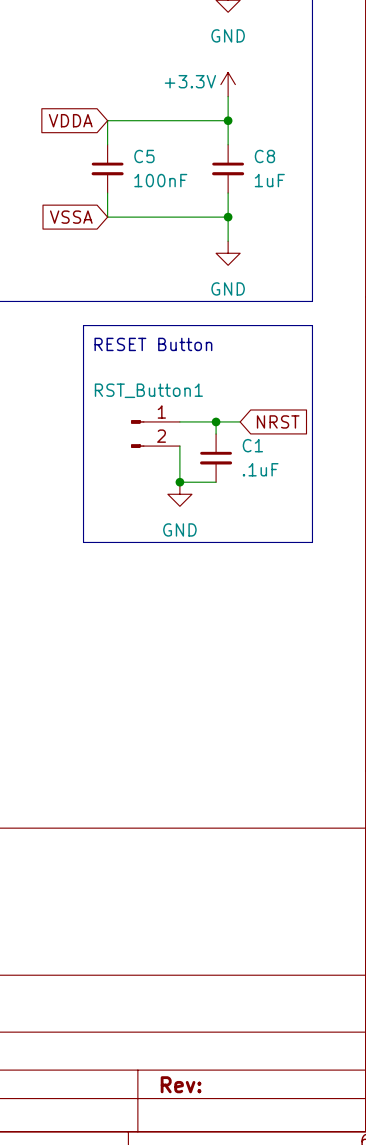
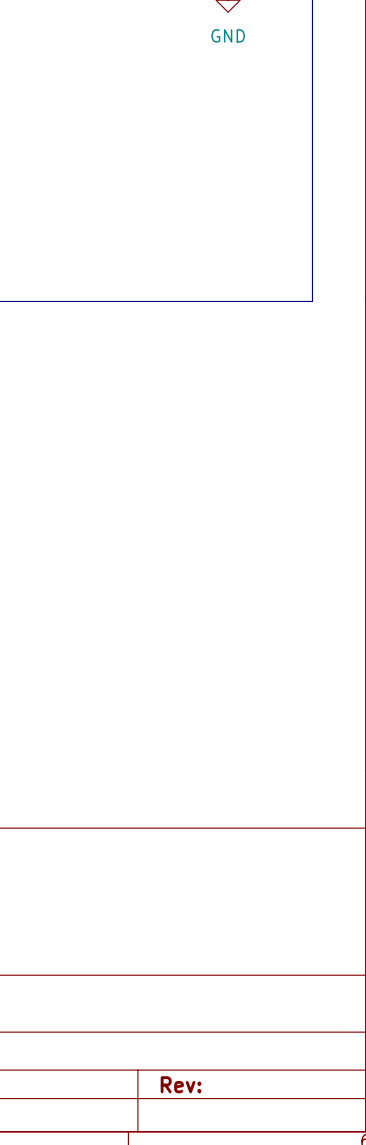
power symbol: +3.3V (228, 84) -> none
wire: (228, 96) (228, 144) -> none
global label: VDDA (70, 120) -> none
wire: (228, 120) (107, 120) (107, 144) -> none
junction: (228, 120) -> none
C5: 100nF (107, 168) -> none
C8: 1uF (228, 168) -> none
wire: (107, 193) (107, 217) (228, 217) -> none
wire: (228, 193) (228, 241) -> none
global label: VSSA (71, 217) -> none
junction: (228, 217) -> none
power symbol: GND (228, 253) -> none
line: (83, 325) (312, 325) (312, 542) (83, 542) (83, 325) -> none
text: RESET Button (153, 344) -> none
wire: (179, 421) (240, 421) -> none
wire: (216, 421) (216, 434) -> none
junction: (216, 421) -> none
global label: NRST (278, 421) -> none
RST_Button1: (155, 434) -> none
wire: (179, 446) (179, 482) (216, 482) -> none
C1: .1uF (216, 458) -> none
junction: (179, 482) -> none
power symbol: GND (179, 494) -> none

